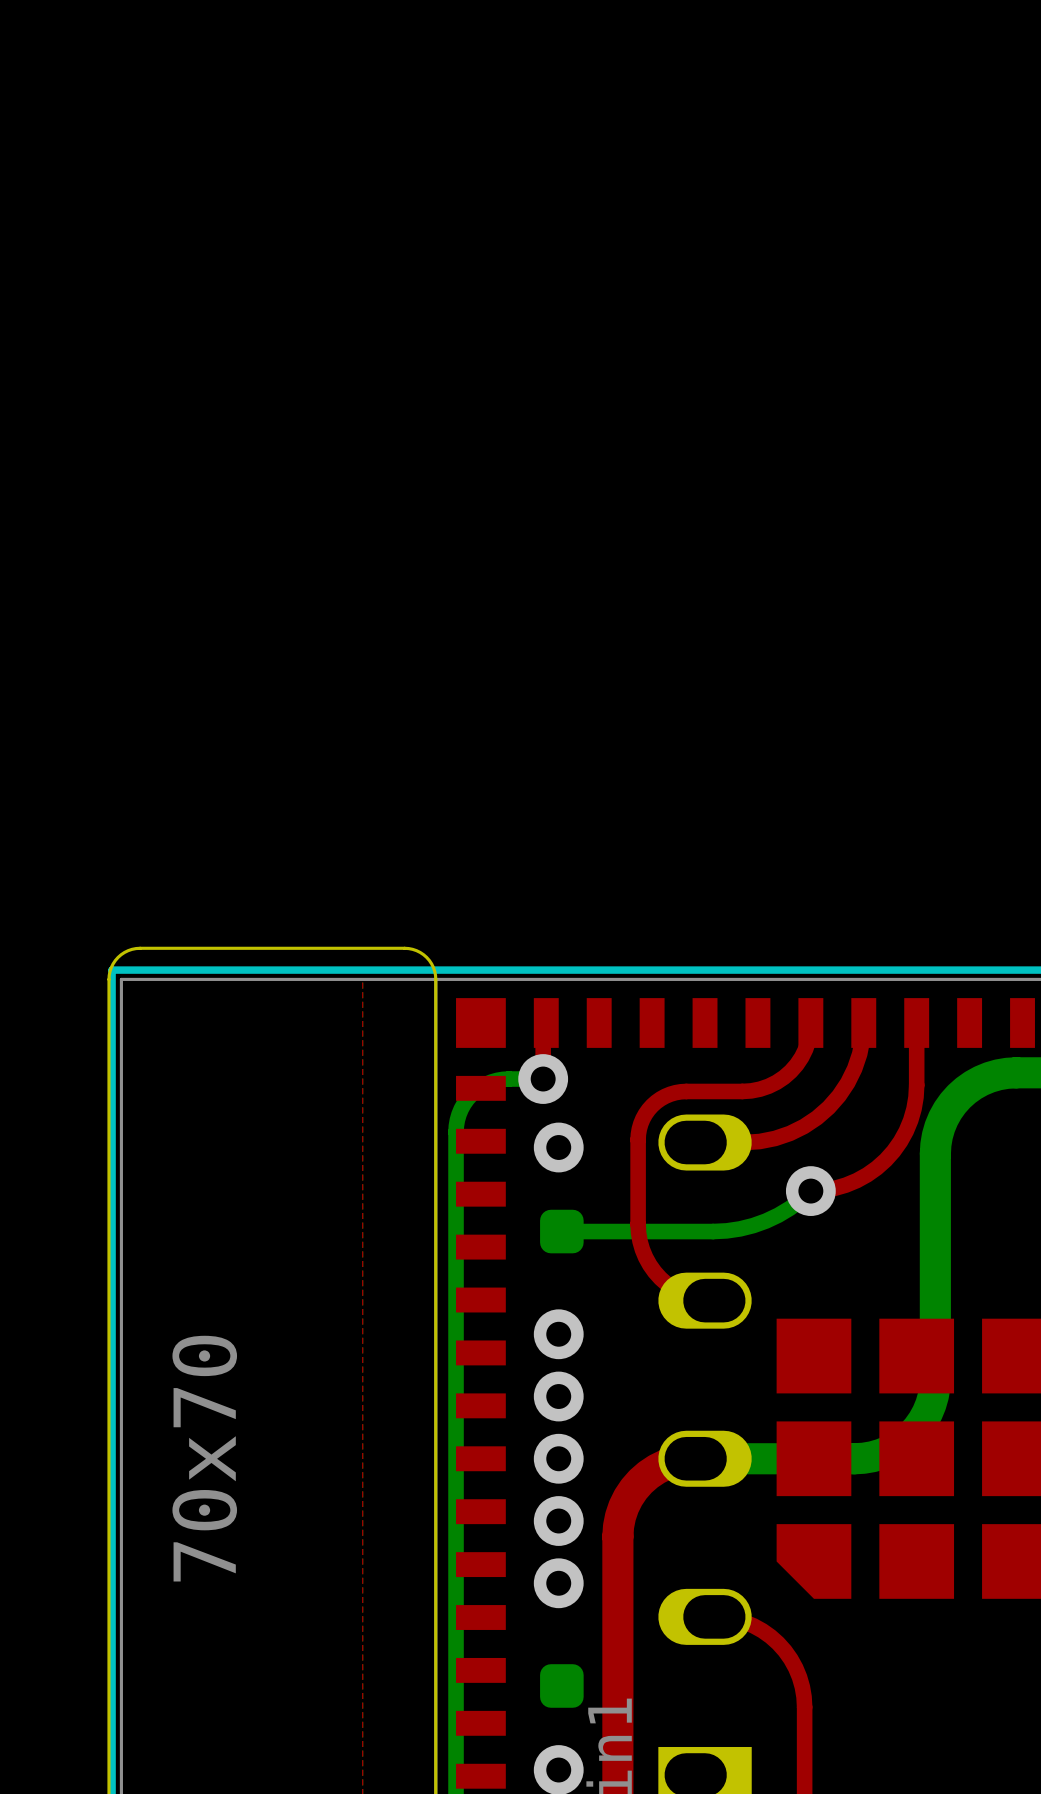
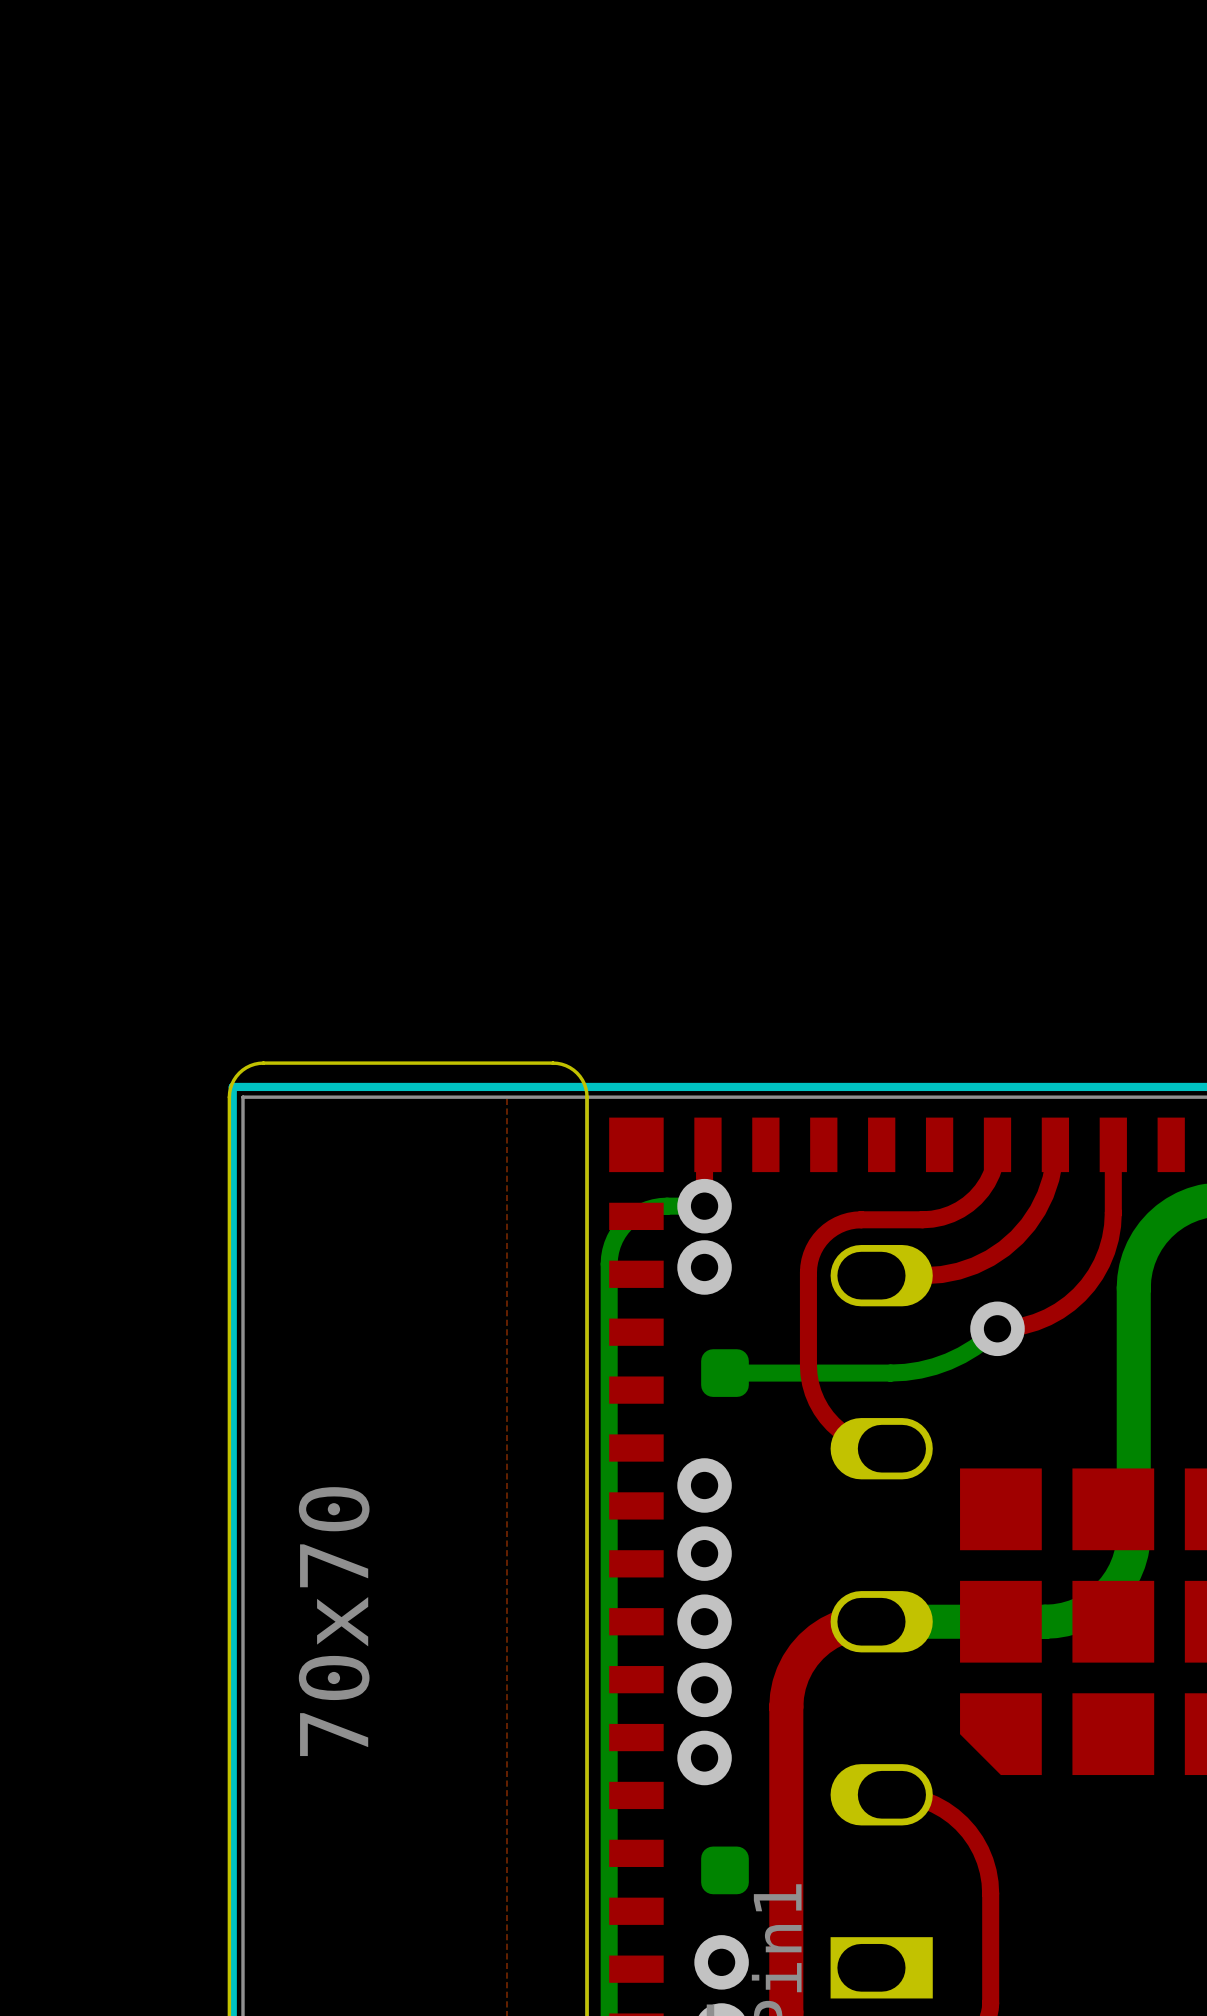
via position: (558, 1147) -> (704, 1267)
via position: (558, 1334) -> (704, 1485)
via position: (558, 1396) -> (704, 1553)
via position: (558, 1458) -> (704, 1621)
via position: (558, 1521) -> (704, 1689)
via position: (558, 1583) -> (704, 1757)

